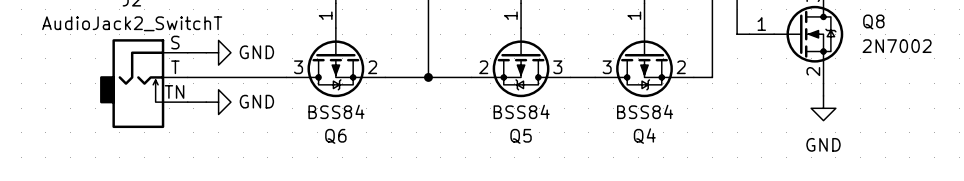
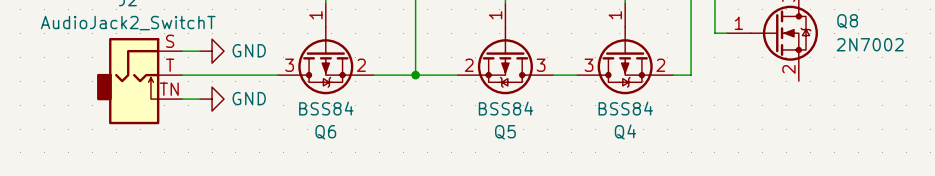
wire: (823, 83) (823, 95) -> none
power symbol: GND (823, 108) -> none

